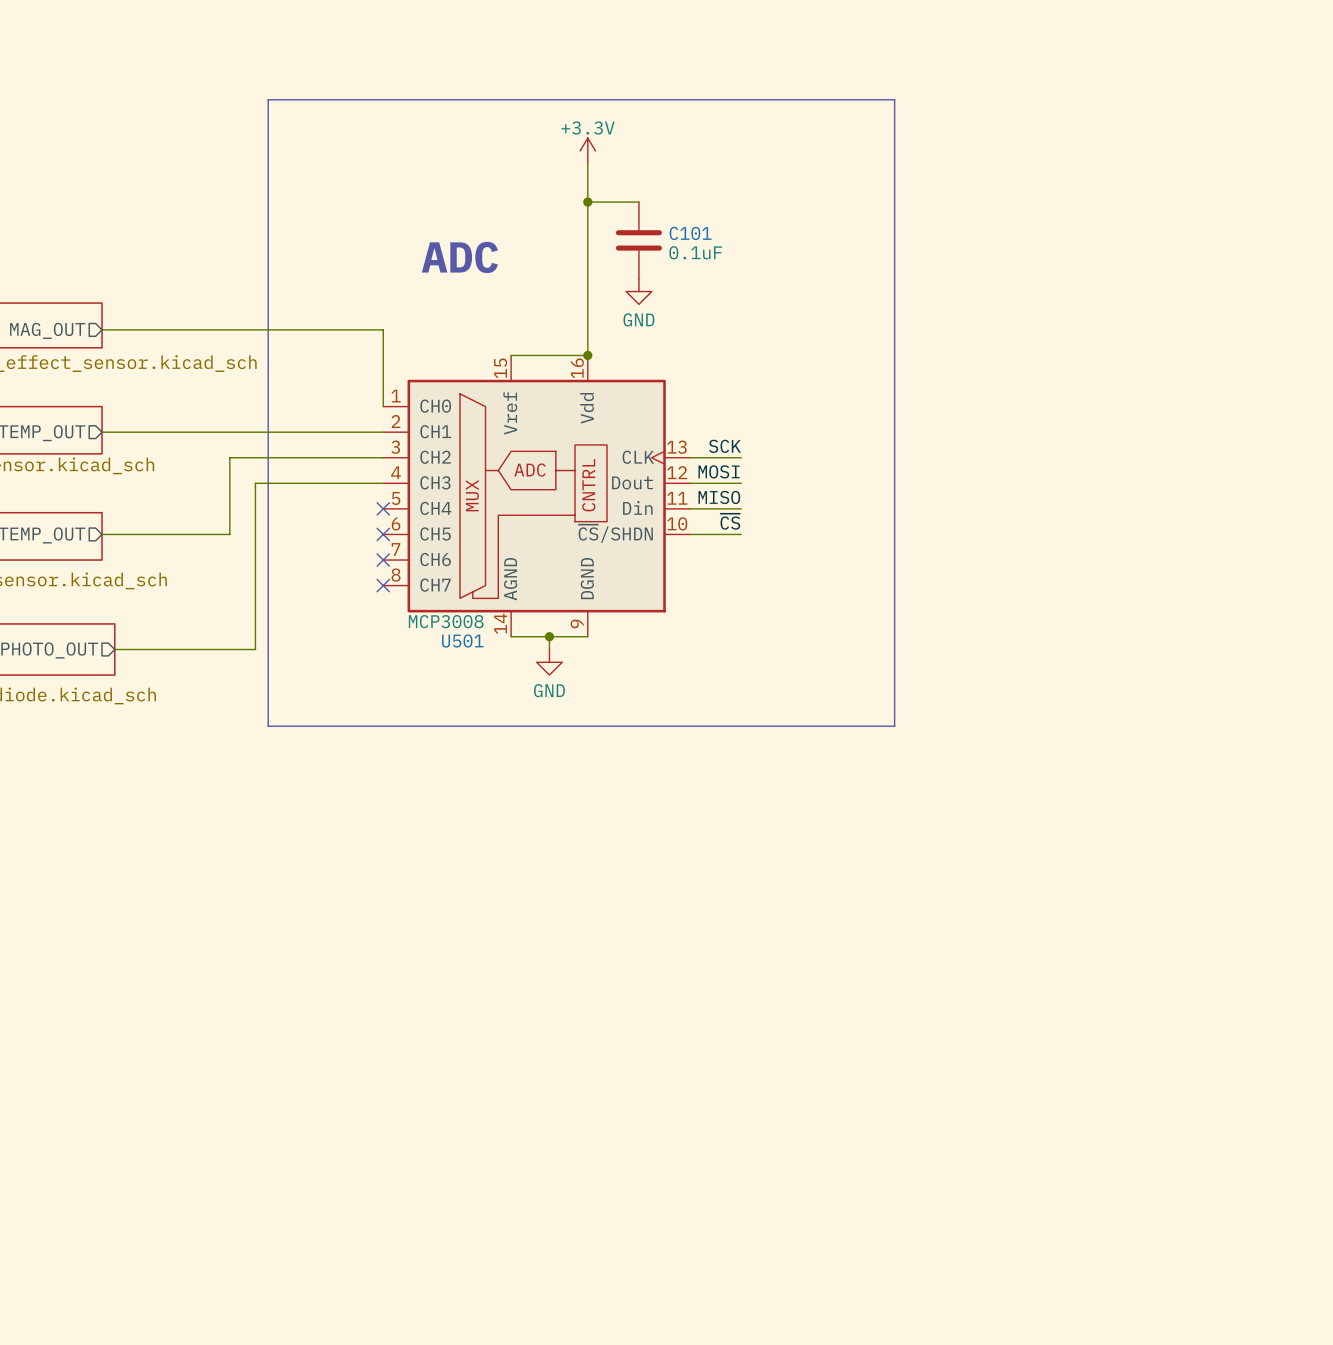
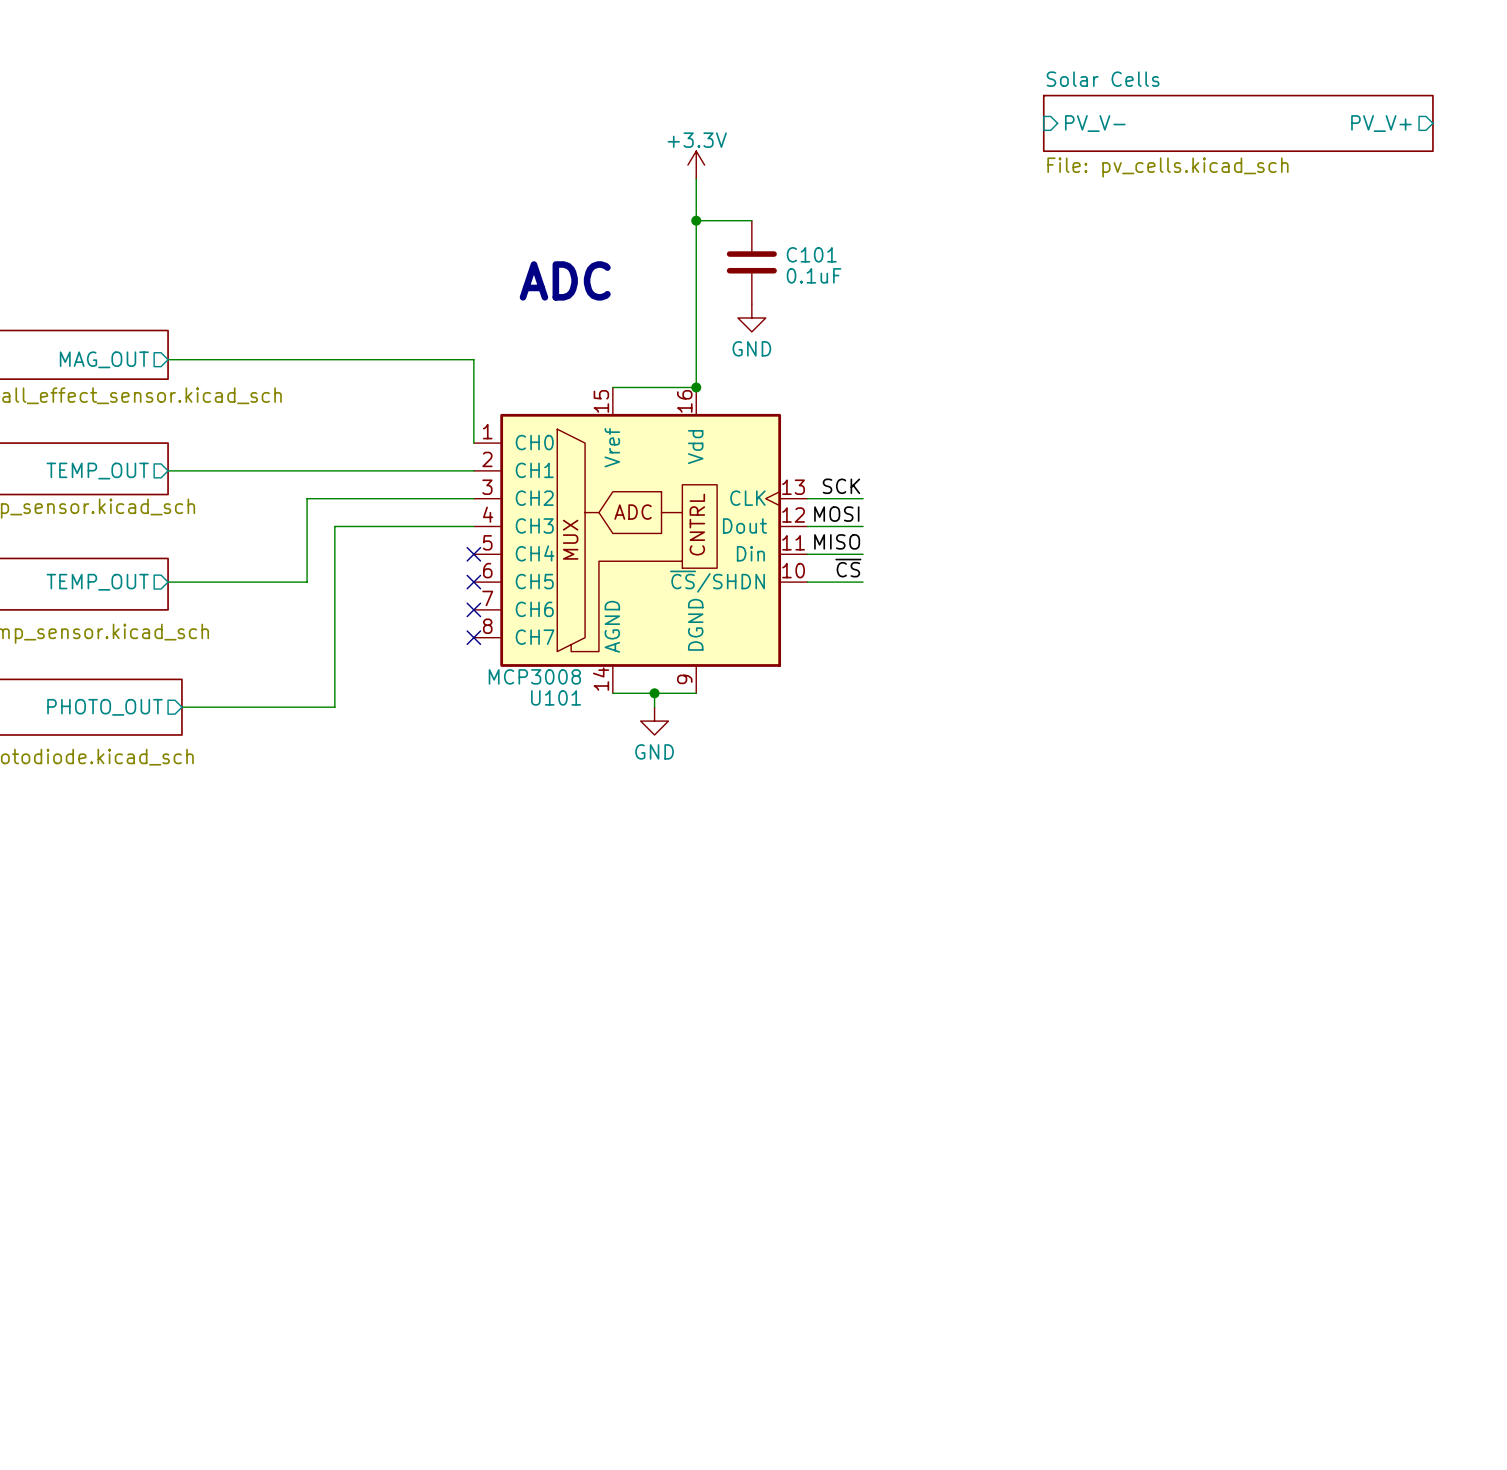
line: (268, 99) (894, 99) (894, 726) (268, 726) (268, 99) -> none
sheet Solar Cells: none -> File: pv_cells.kicad_sch (1238, 123)
sheet pin: none -> PV_V- (1095, 123)
sheet pin: none -> PV_V+ (1381, 123)
U501 name: U501 (462, 640) -> U101 (556, 697)

